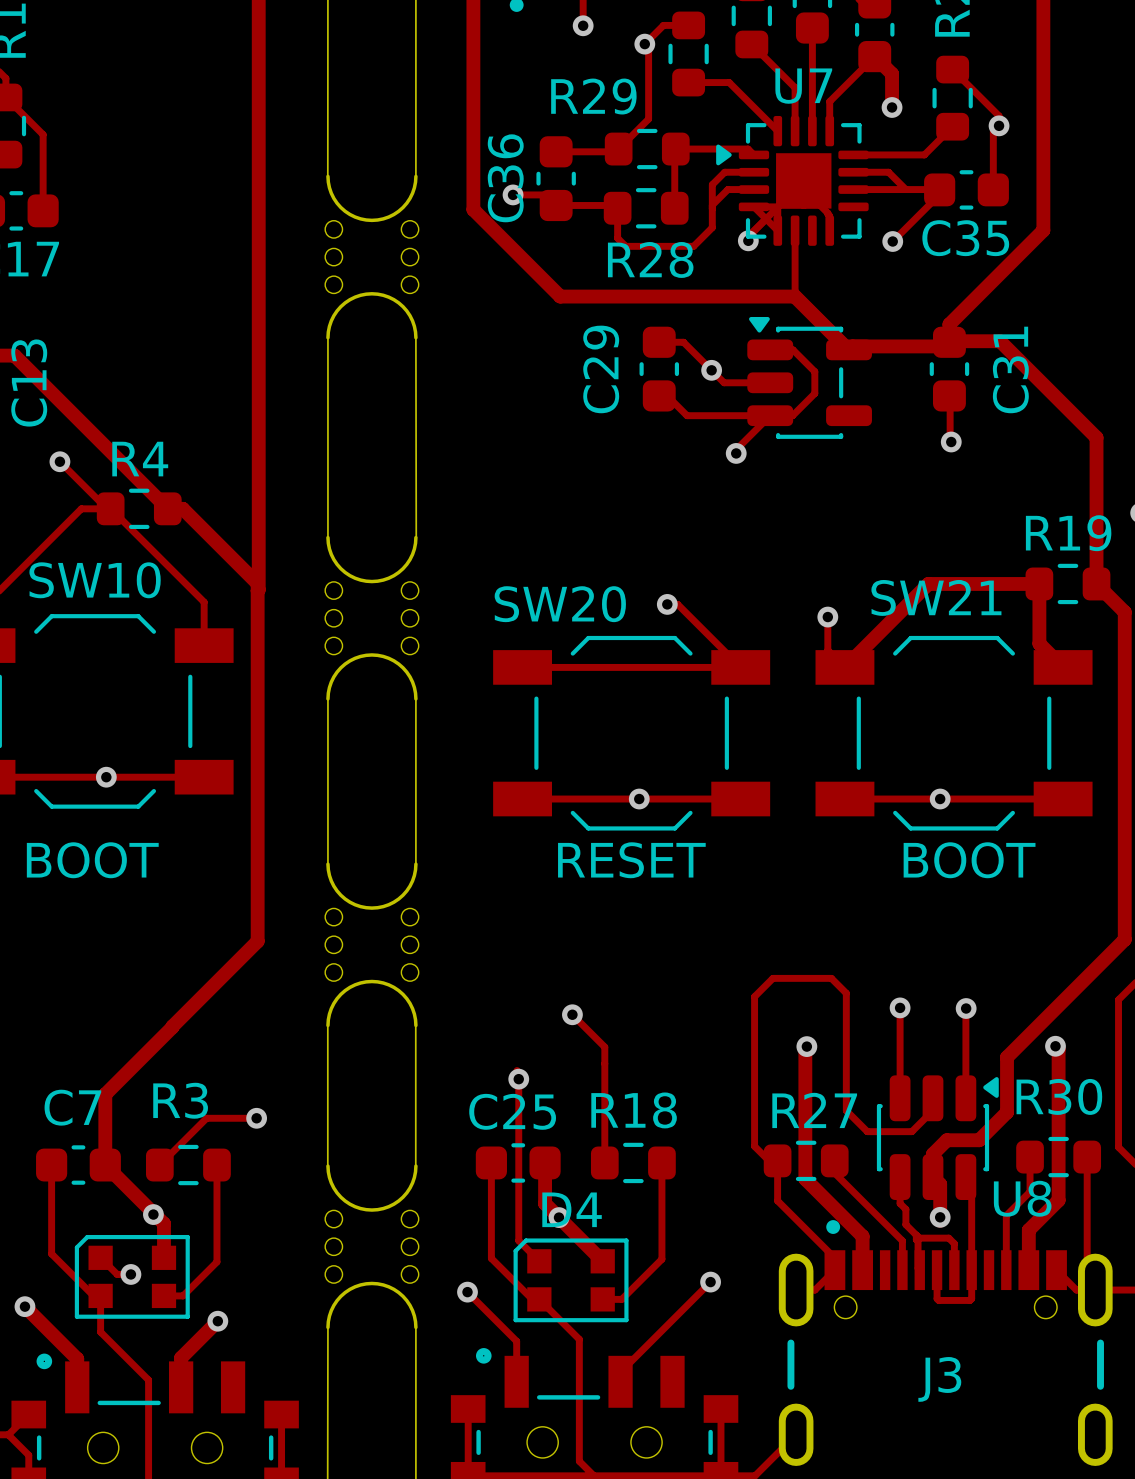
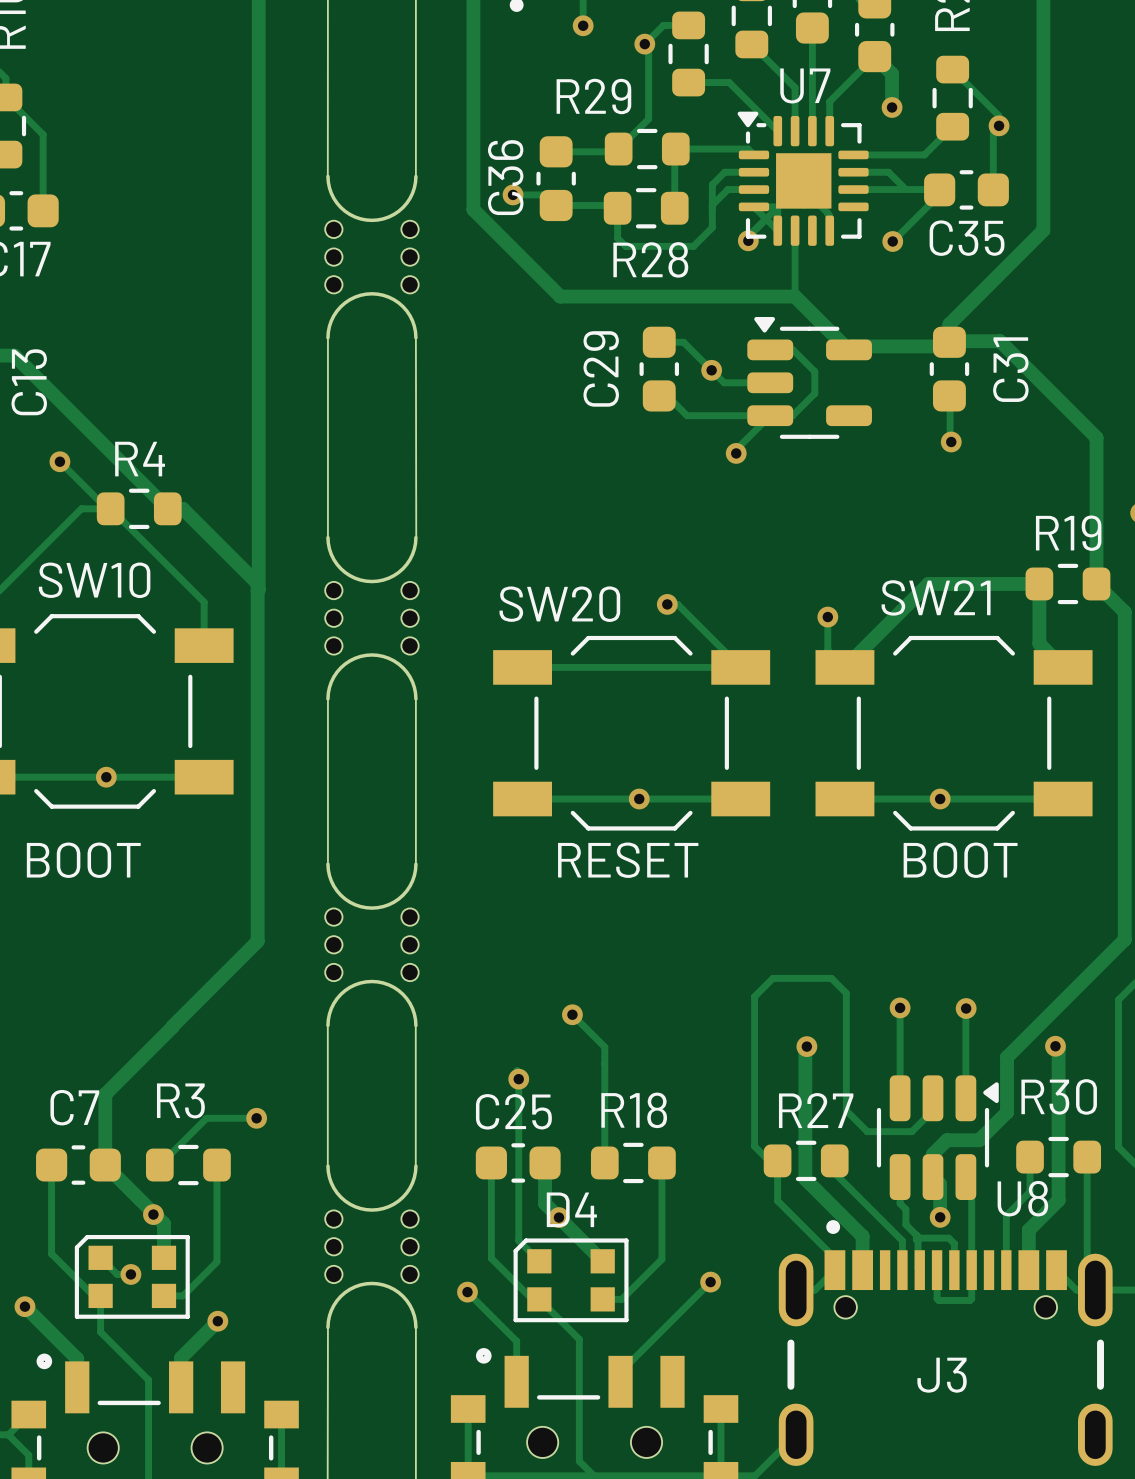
U7 footprint: [716, 115, 869, 246] -> [737, 111, 869, 246]
part footprint: [747, 316, 872, 439] -> [747, 316, 872, 439]
U8 footprint: [876, 1075, 999, 1201] -> [876, 1075, 999, 1201]

